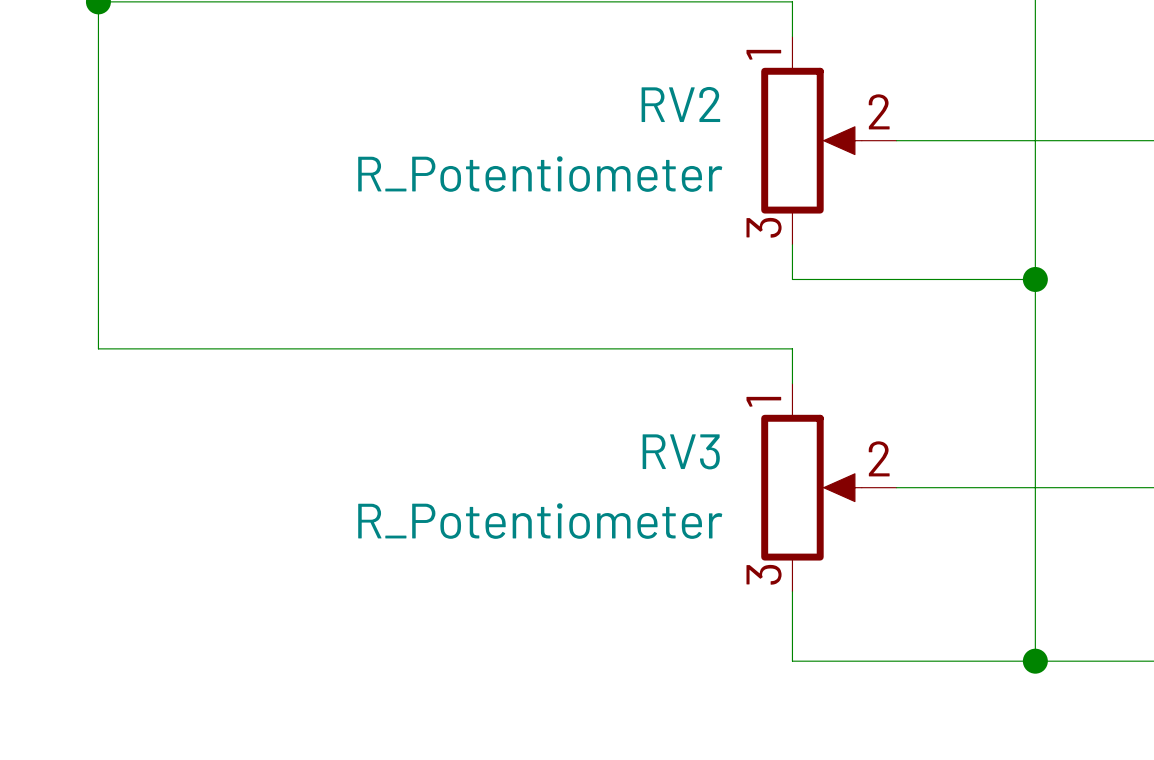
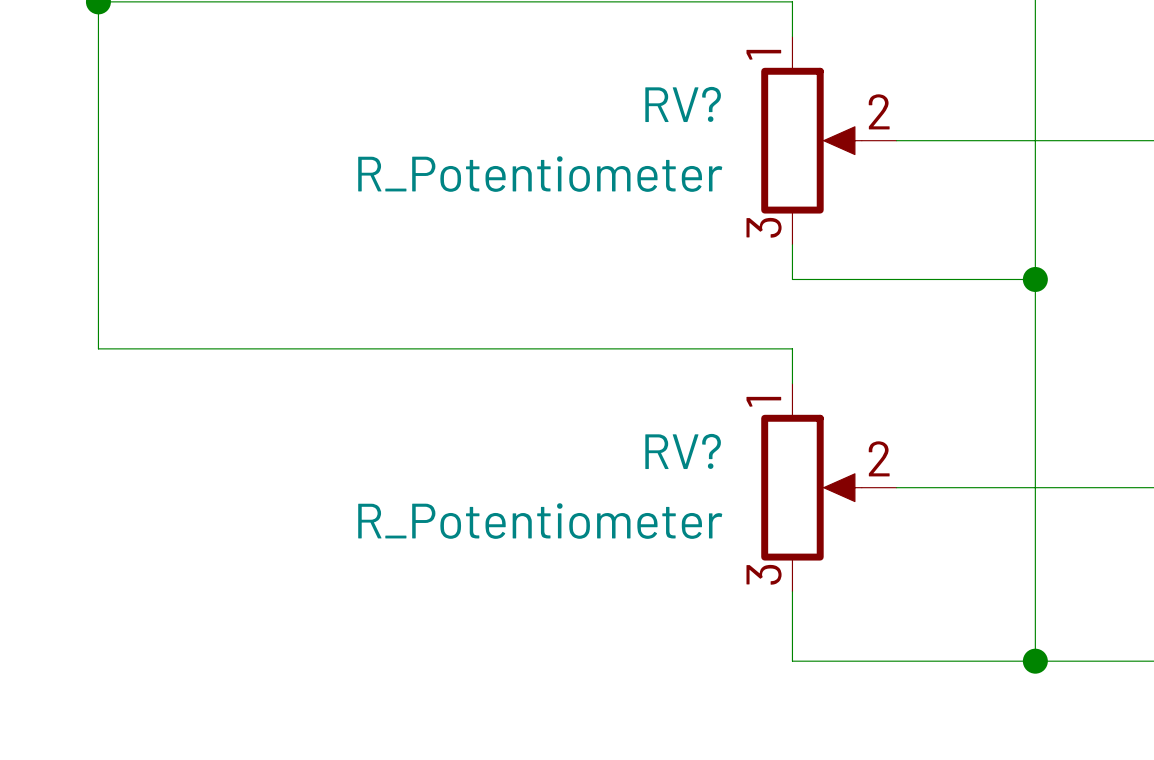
RV2 name: RV2 (680, 104) -> RV? (683, 104)
RV3 name: RV3 (681, 451) -> RV? (683, 451)

